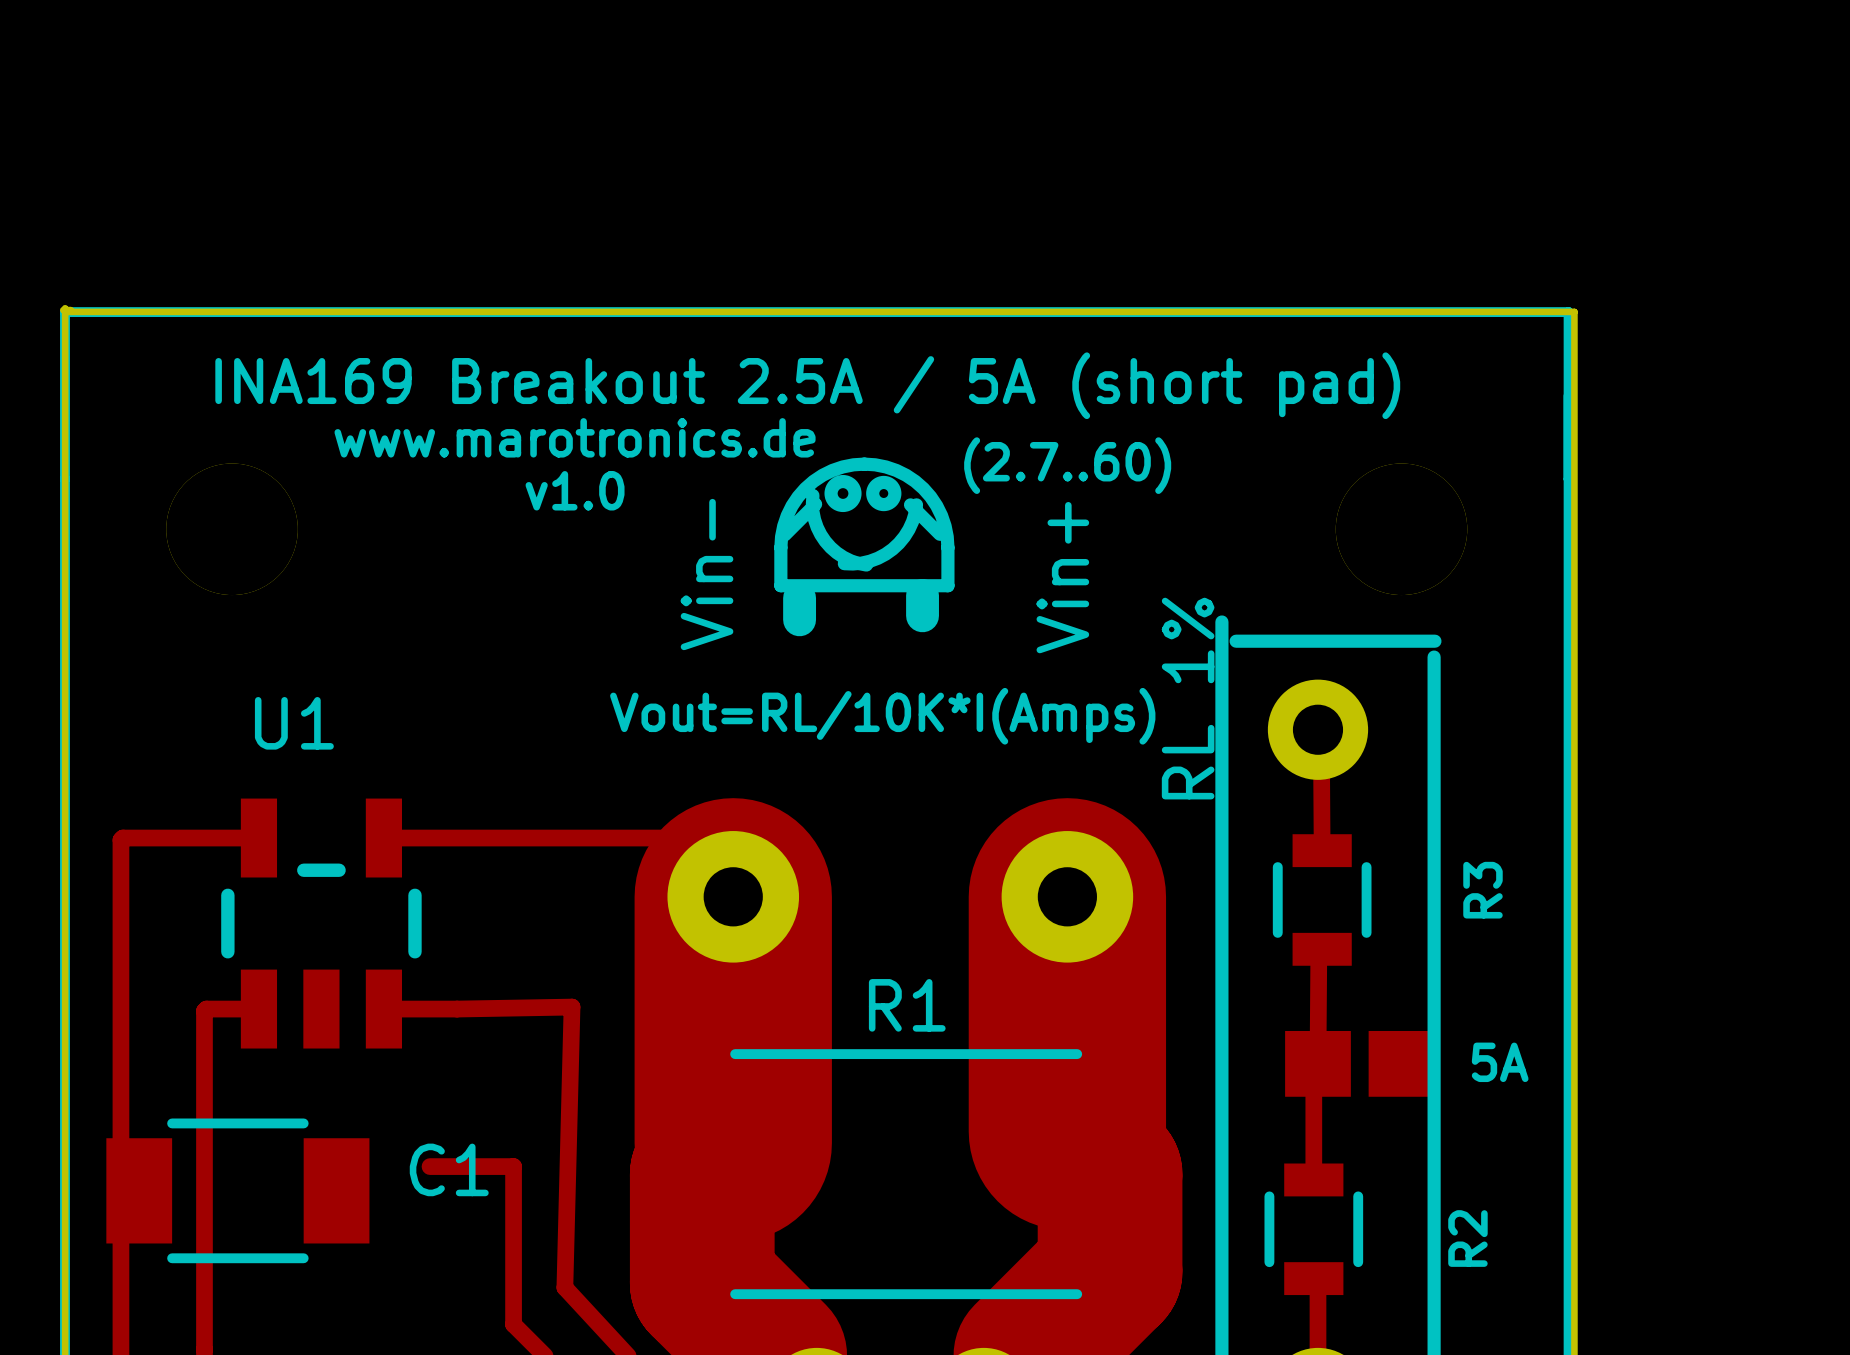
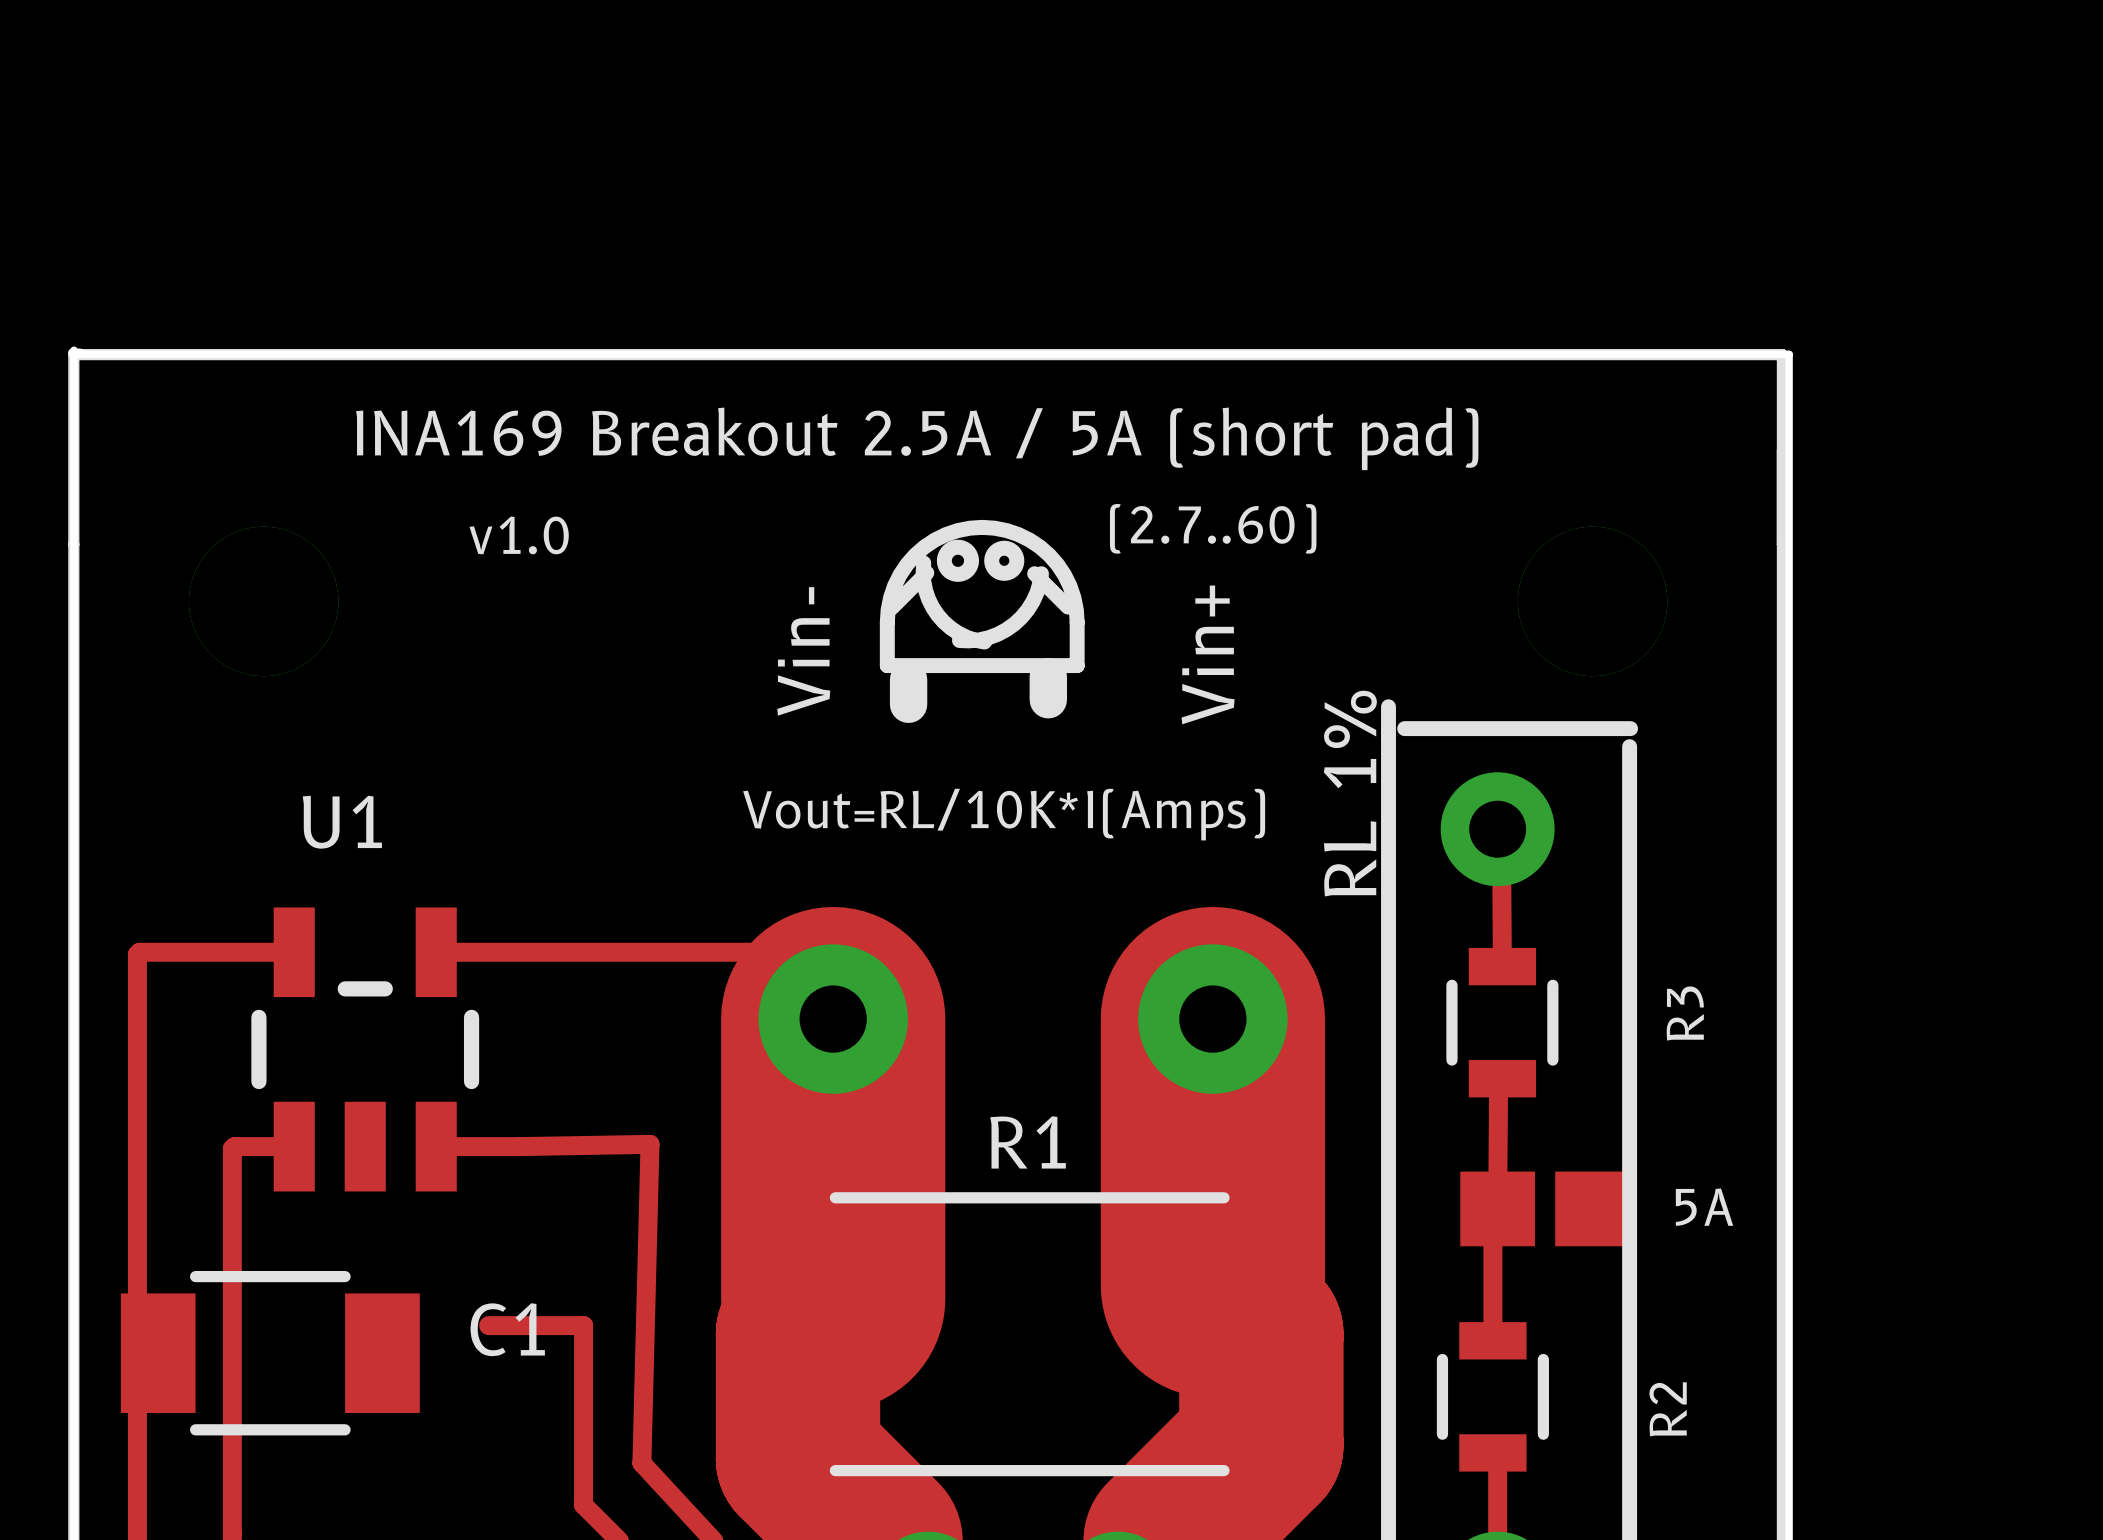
text: www.marotronics.de (575, 437) -> none
text position: v1.0 (575, 490) -> v1.0 (519, 535)

